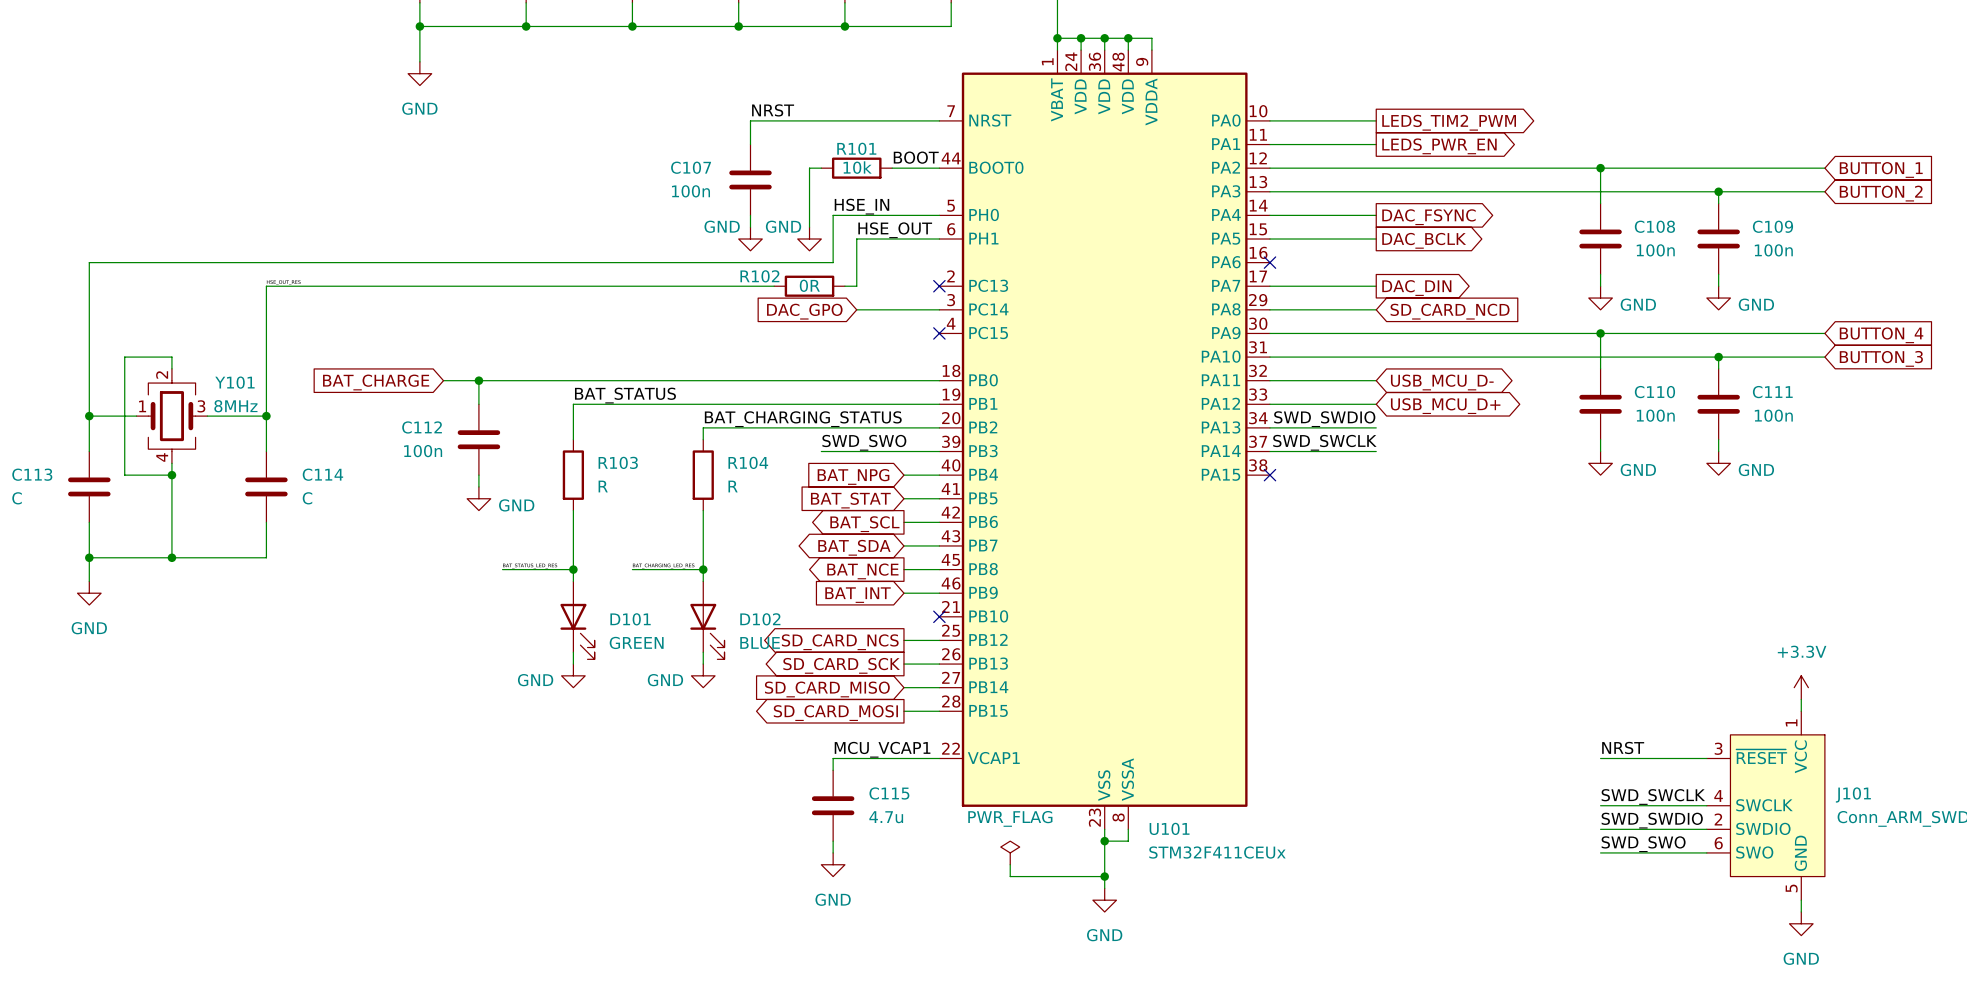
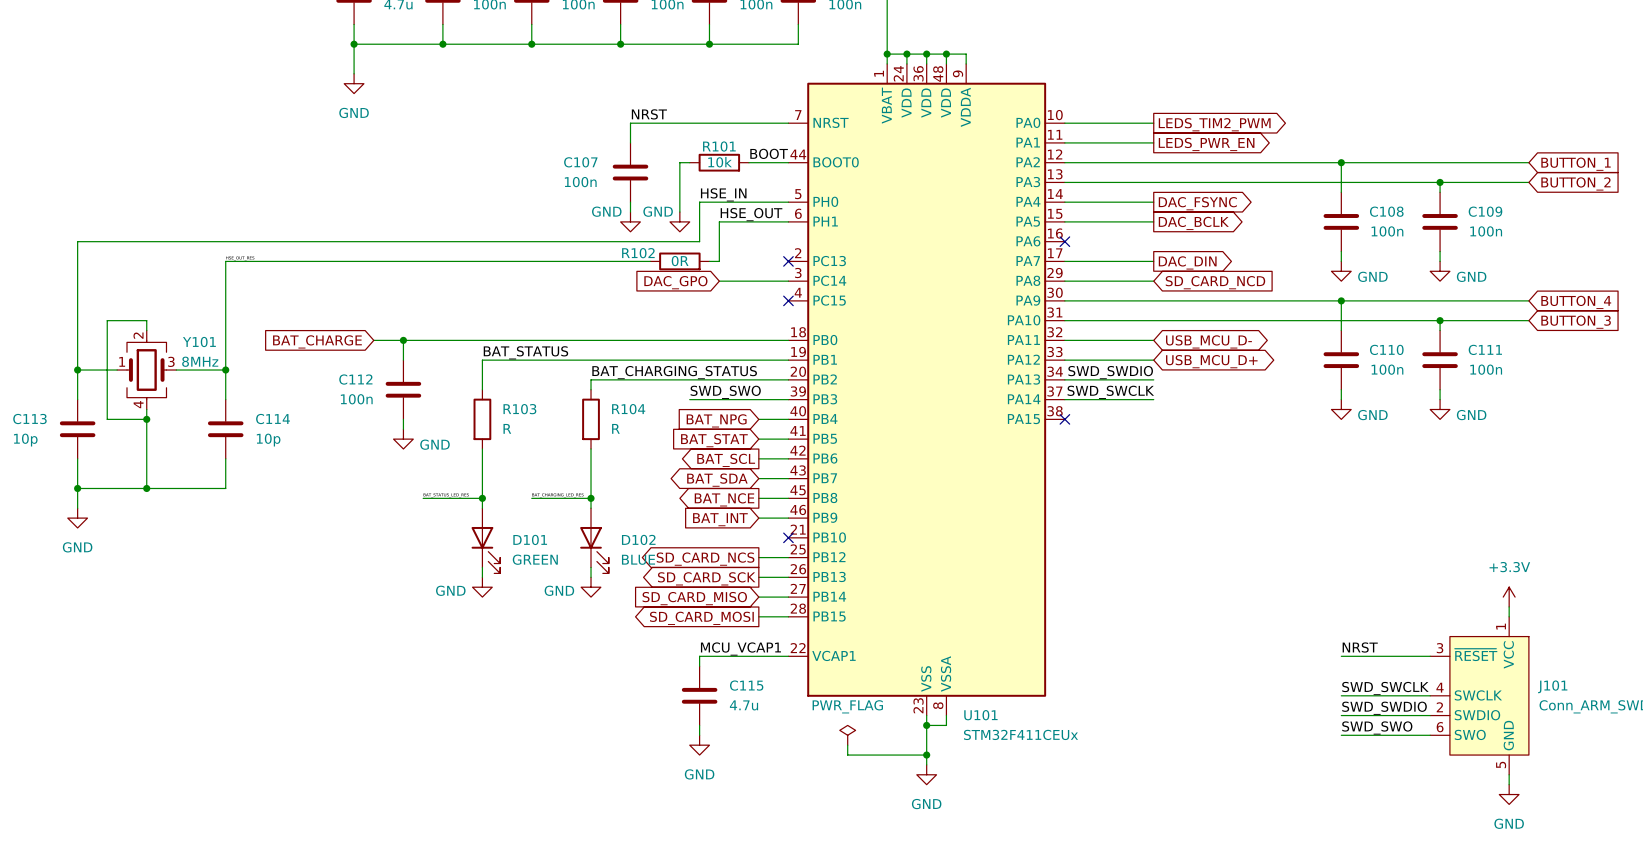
C113 value: C (17, 498) -> 10p (25, 440)
C114 value: C (307, 498) -> 10p (268, 440)

